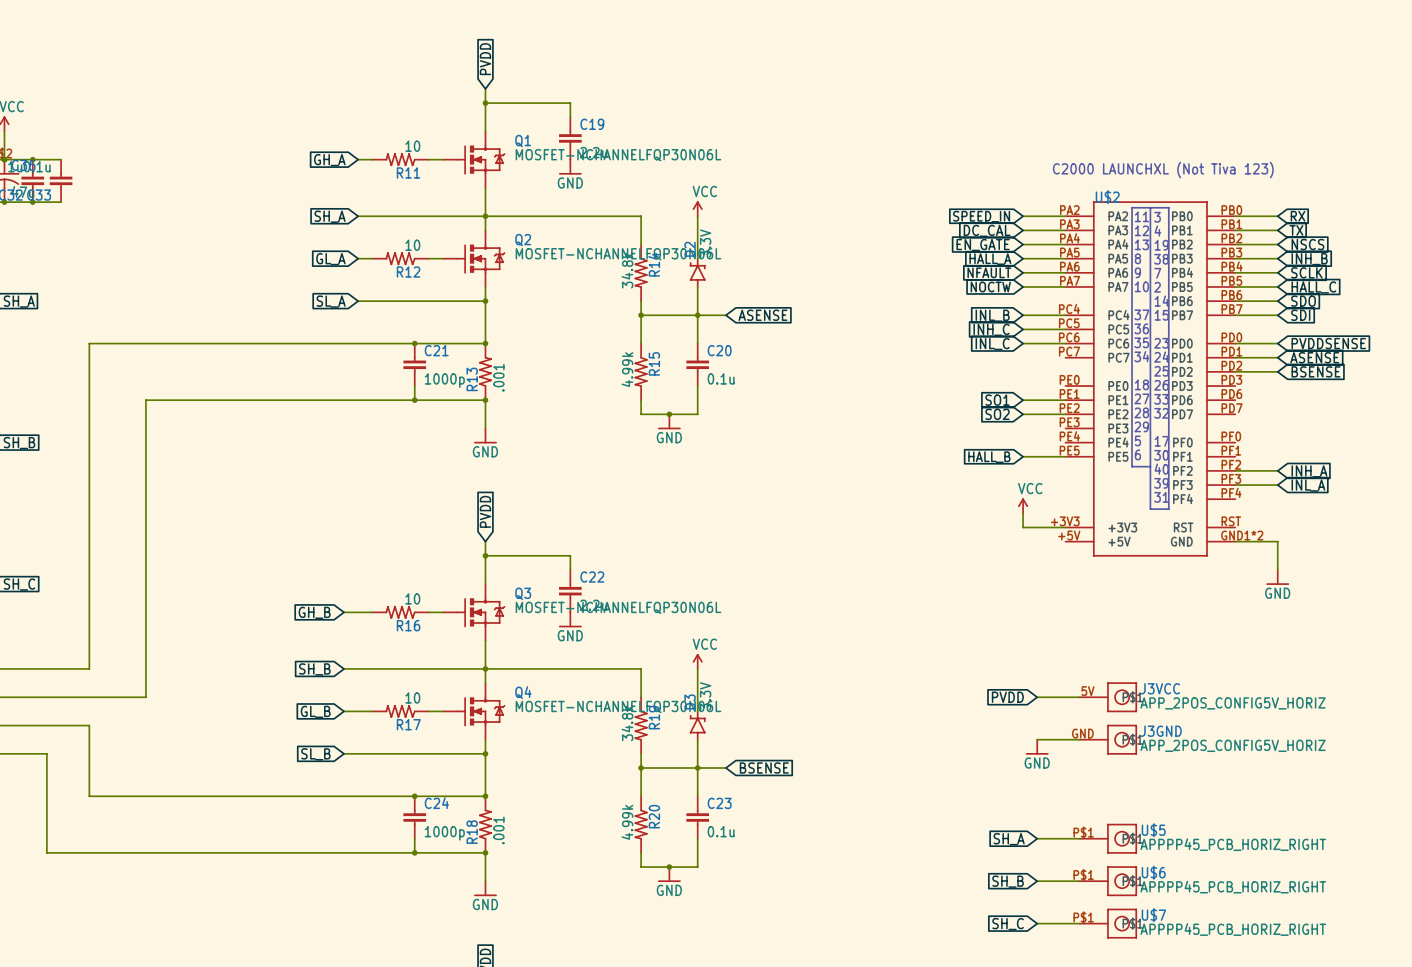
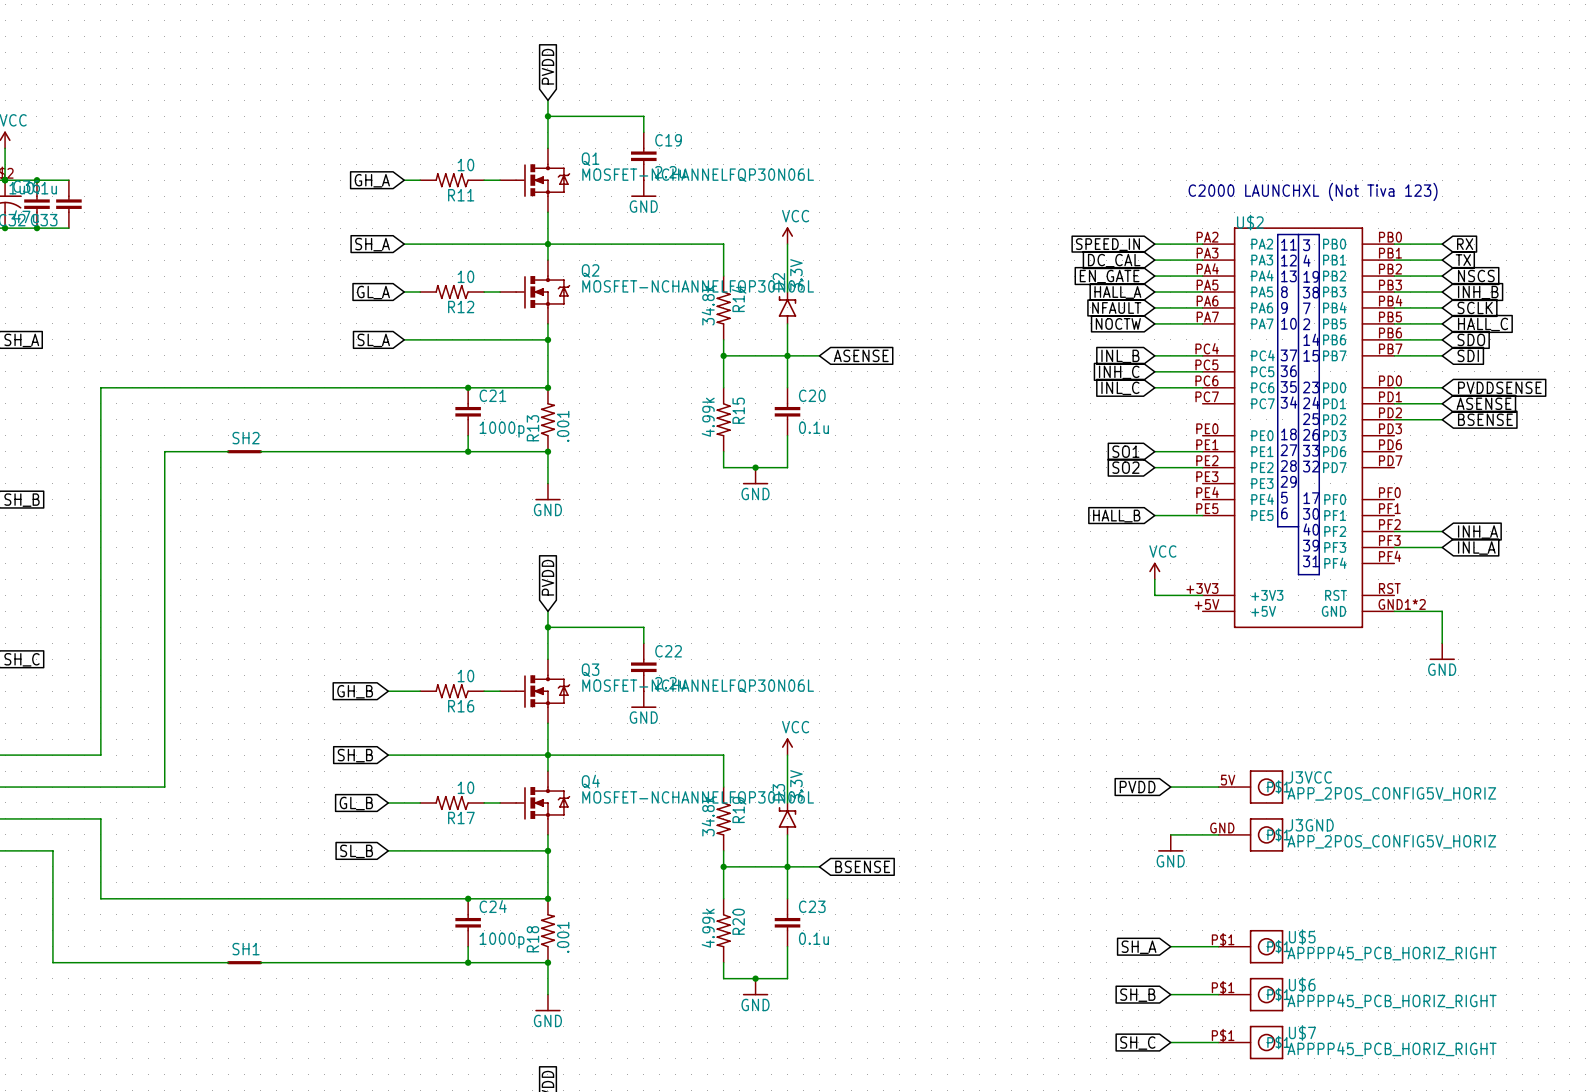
SH2: none -> (244, 451)
SH1: none -> (244, 962)

